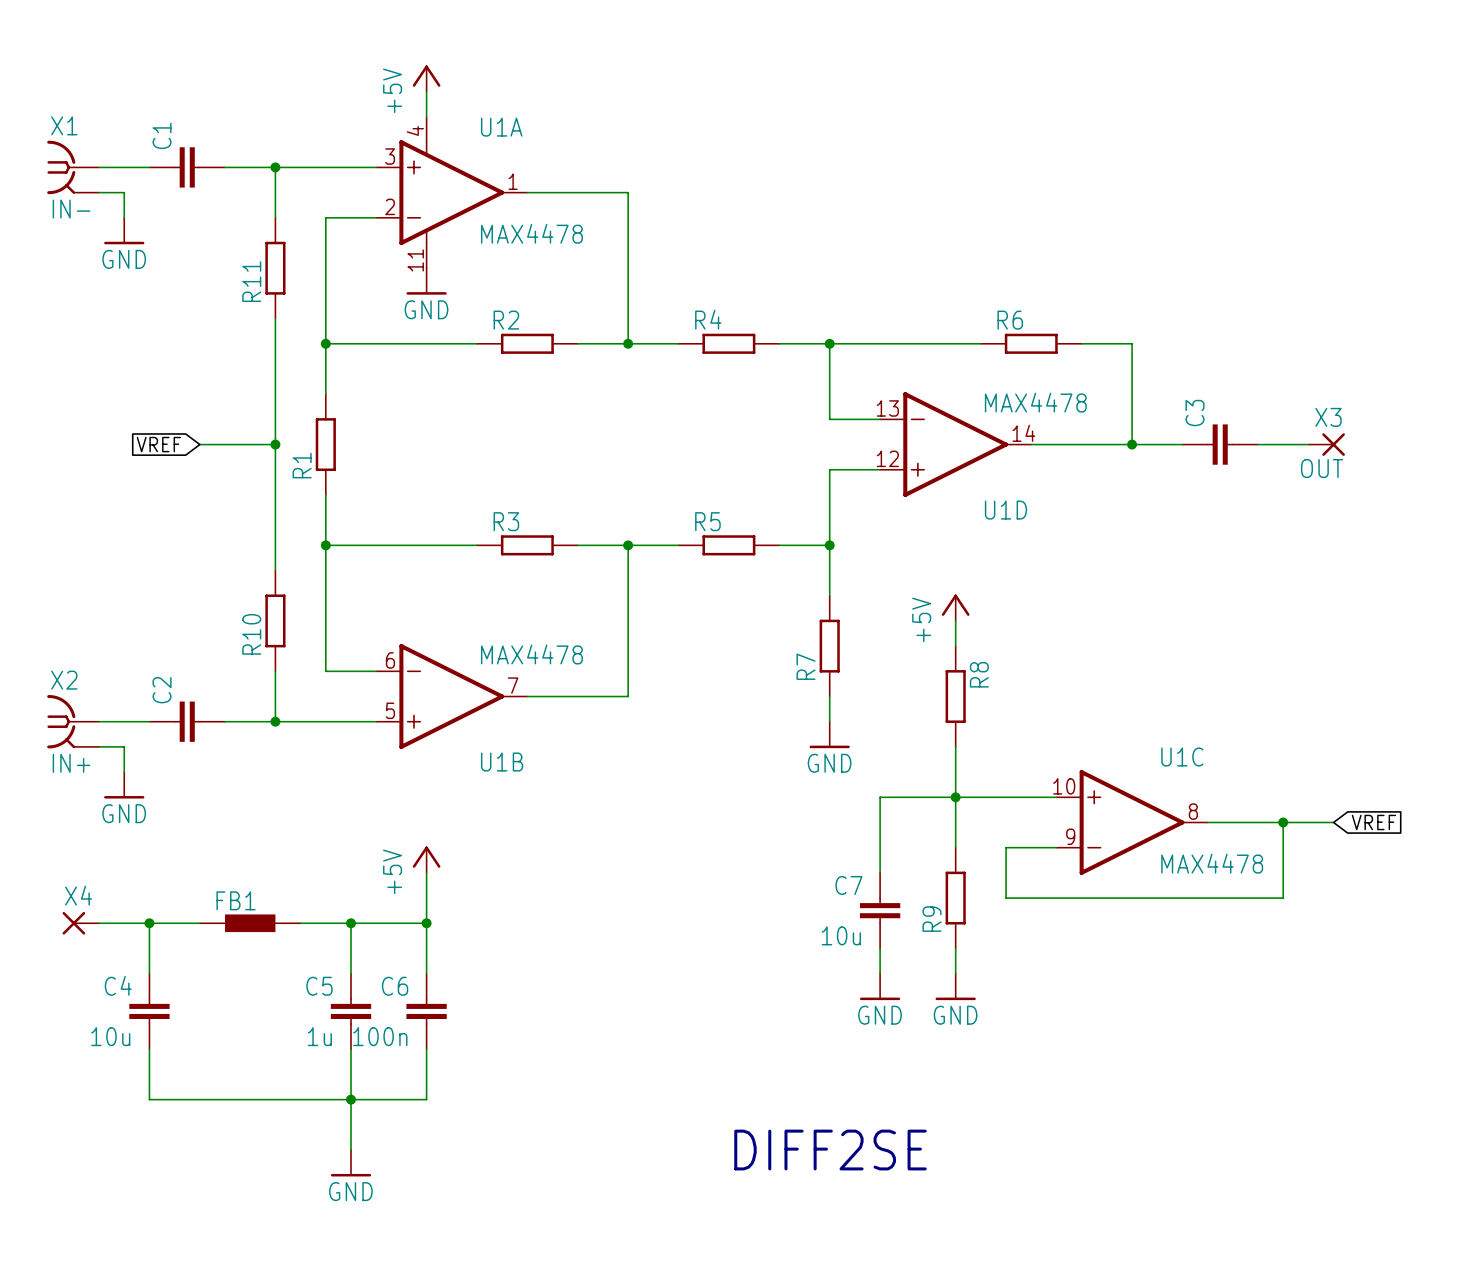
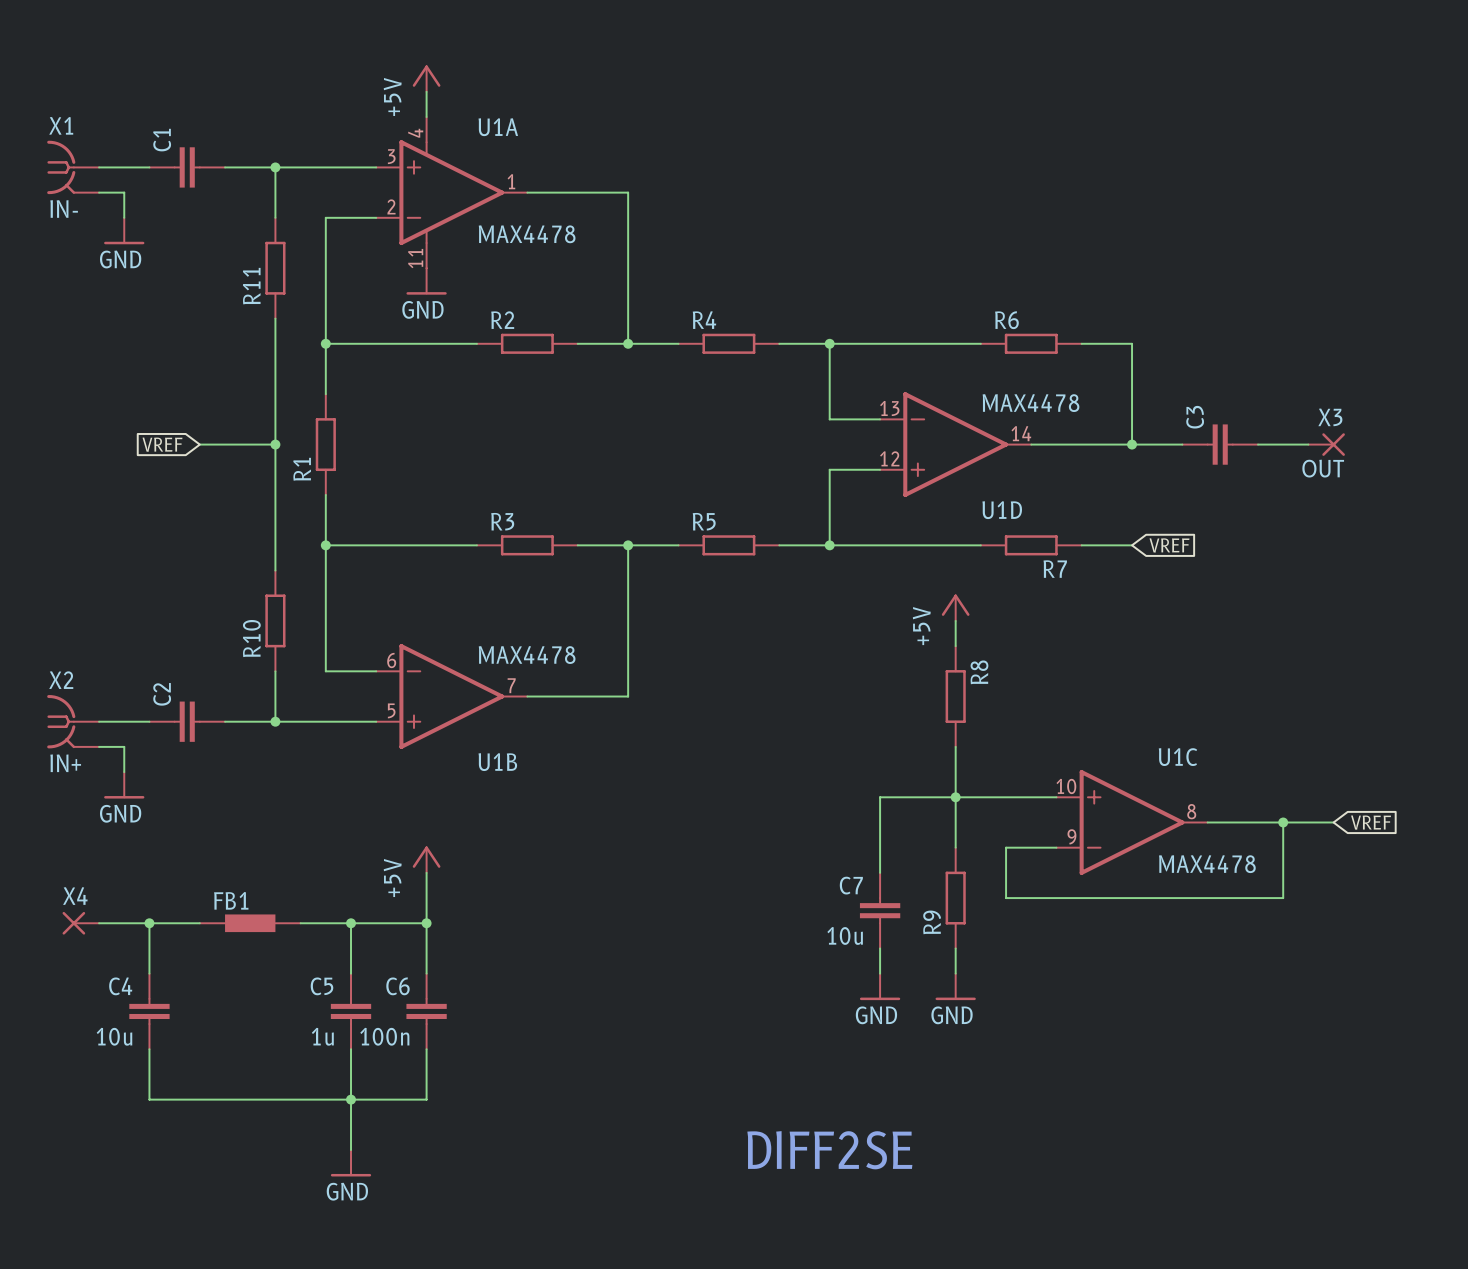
wire: (829, 545) (829, 595) -> (829, 545) (980, 545)
wire: none -> (1081, 545) (1132, 545)
global label: none -> VREF (1169, 545)
R7 rotation: 0° (829, 646) -> 90° clockwise (1031, 545)
R7 position: (829, 646) -> (1031, 545)
R7 name position: R7 (806, 666) -> R7 (1055, 569)
wire: (829, 696) (829, 721) -> none
power symbol: GND (829, 734) -> none

